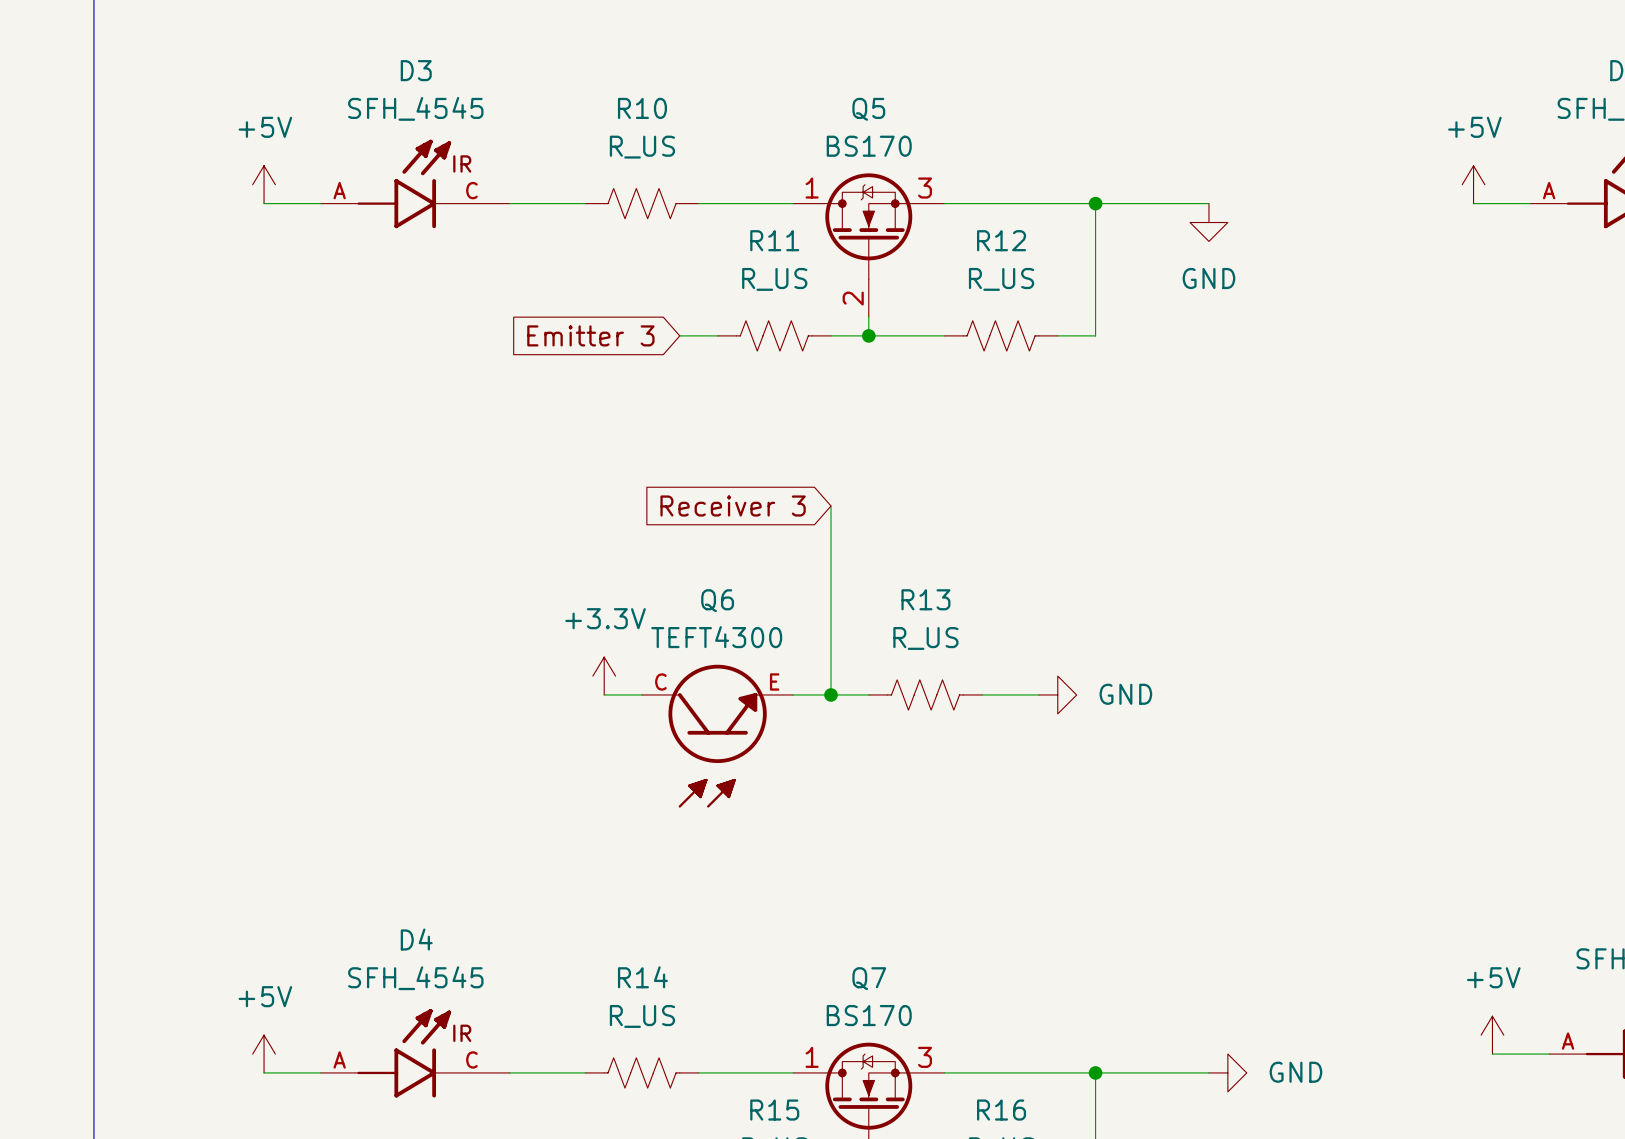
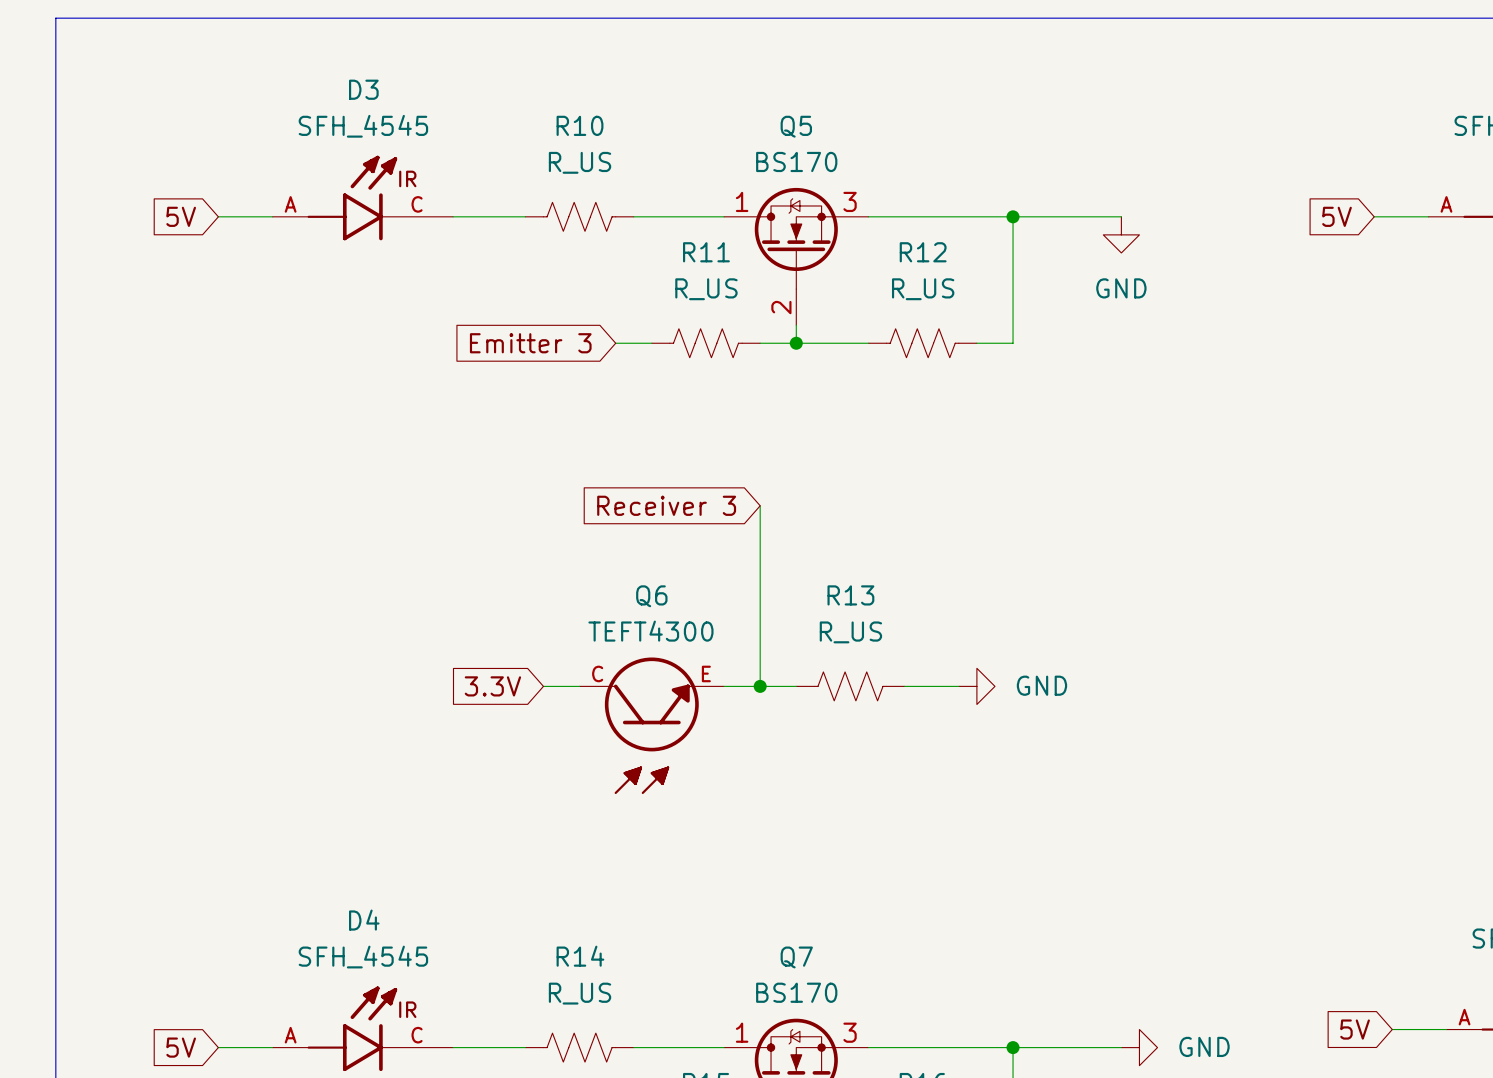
power symbol: +5V (264, 184) -> none
power symbol: +5V (1473, 184) -> none
global label: none -> 5V (181, 216)
global label: none -> 5V (1337, 216)
power symbol: +3.3V (604, 676) -> none
global label: none -> 3.3V (492, 686)
power symbol: +5V (1492, 1035) -> none
power symbol: +5V (264, 1054) -> none
global label: none -> 5V (1355, 1029)
global label: none -> 5V (181, 1047)

